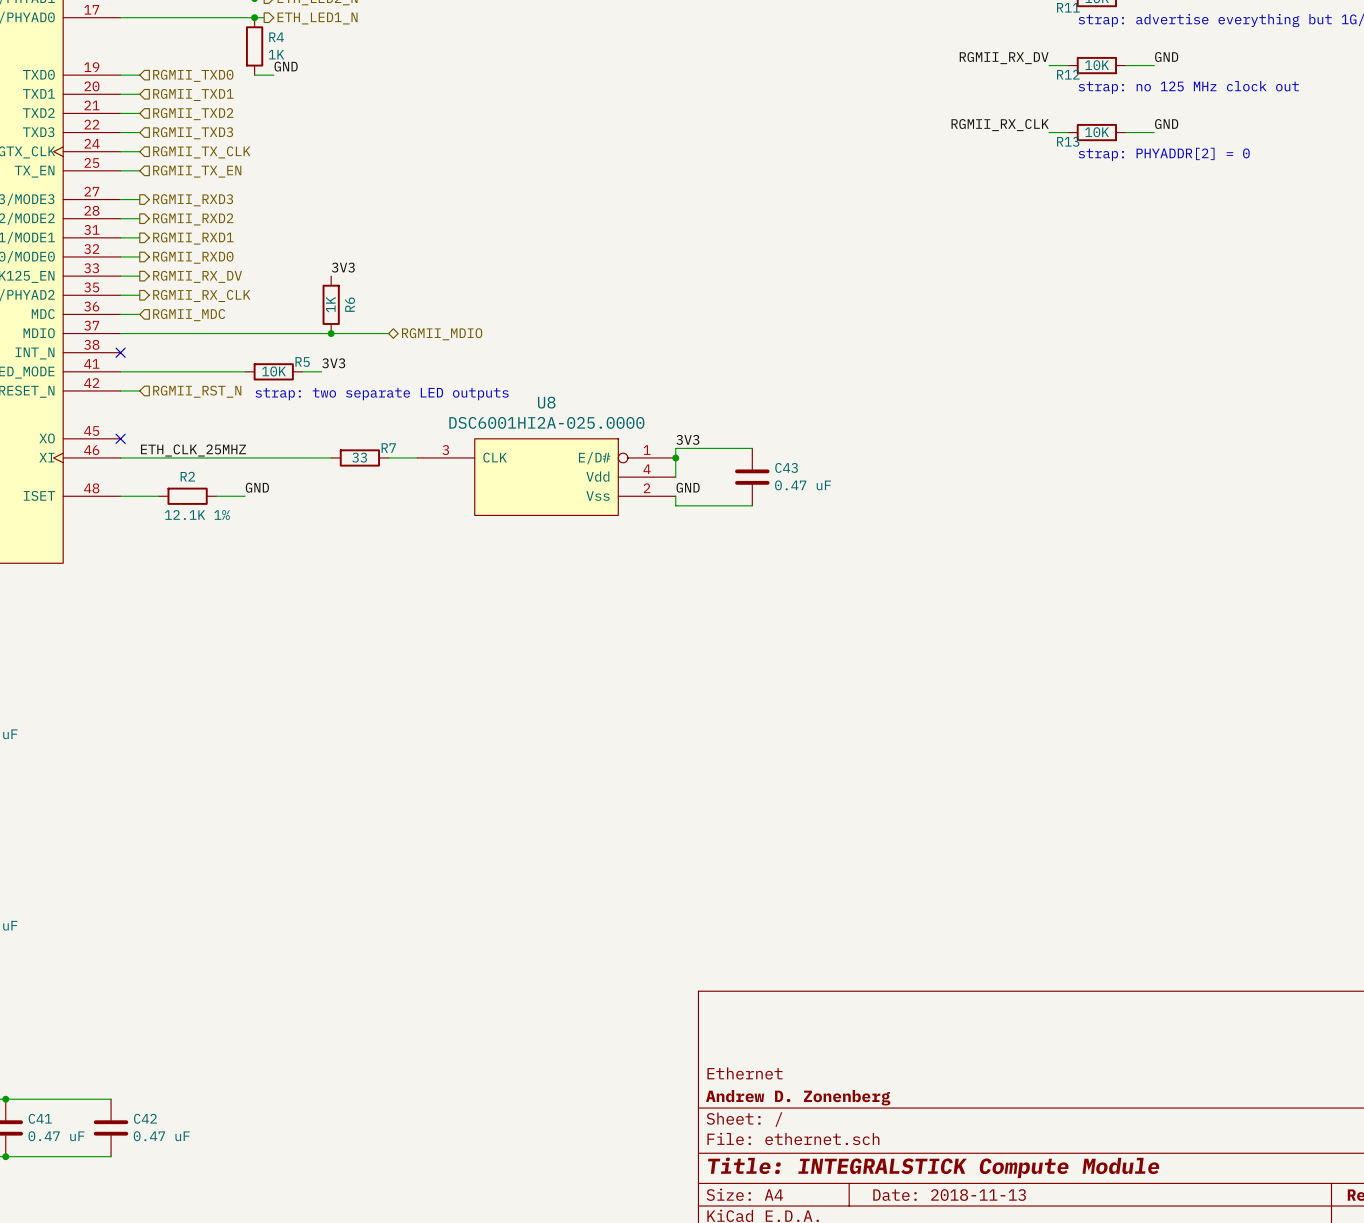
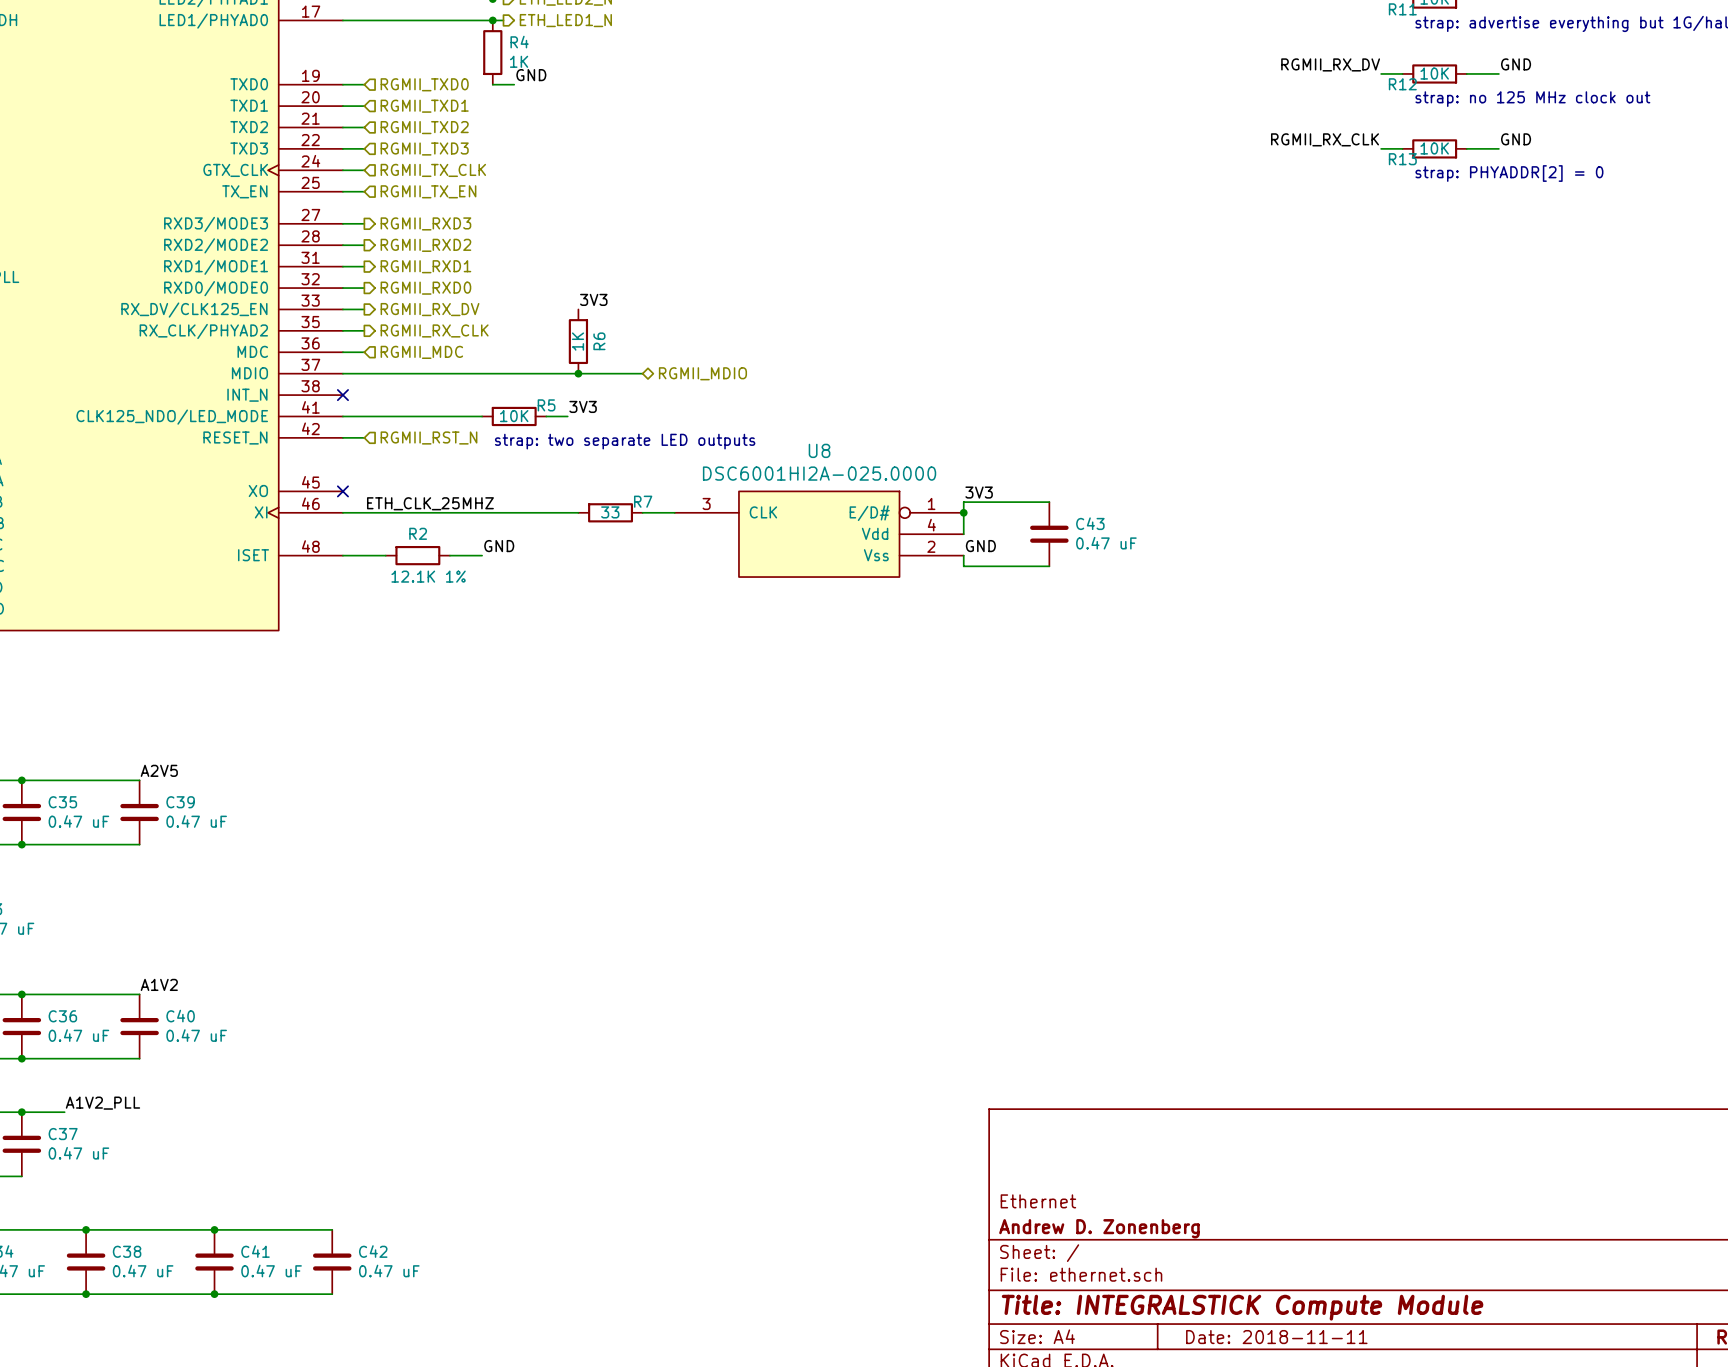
title block: Date: 2018-11-13 (949, 1195) -> Date: 2018-11-11 (1276, 1337)

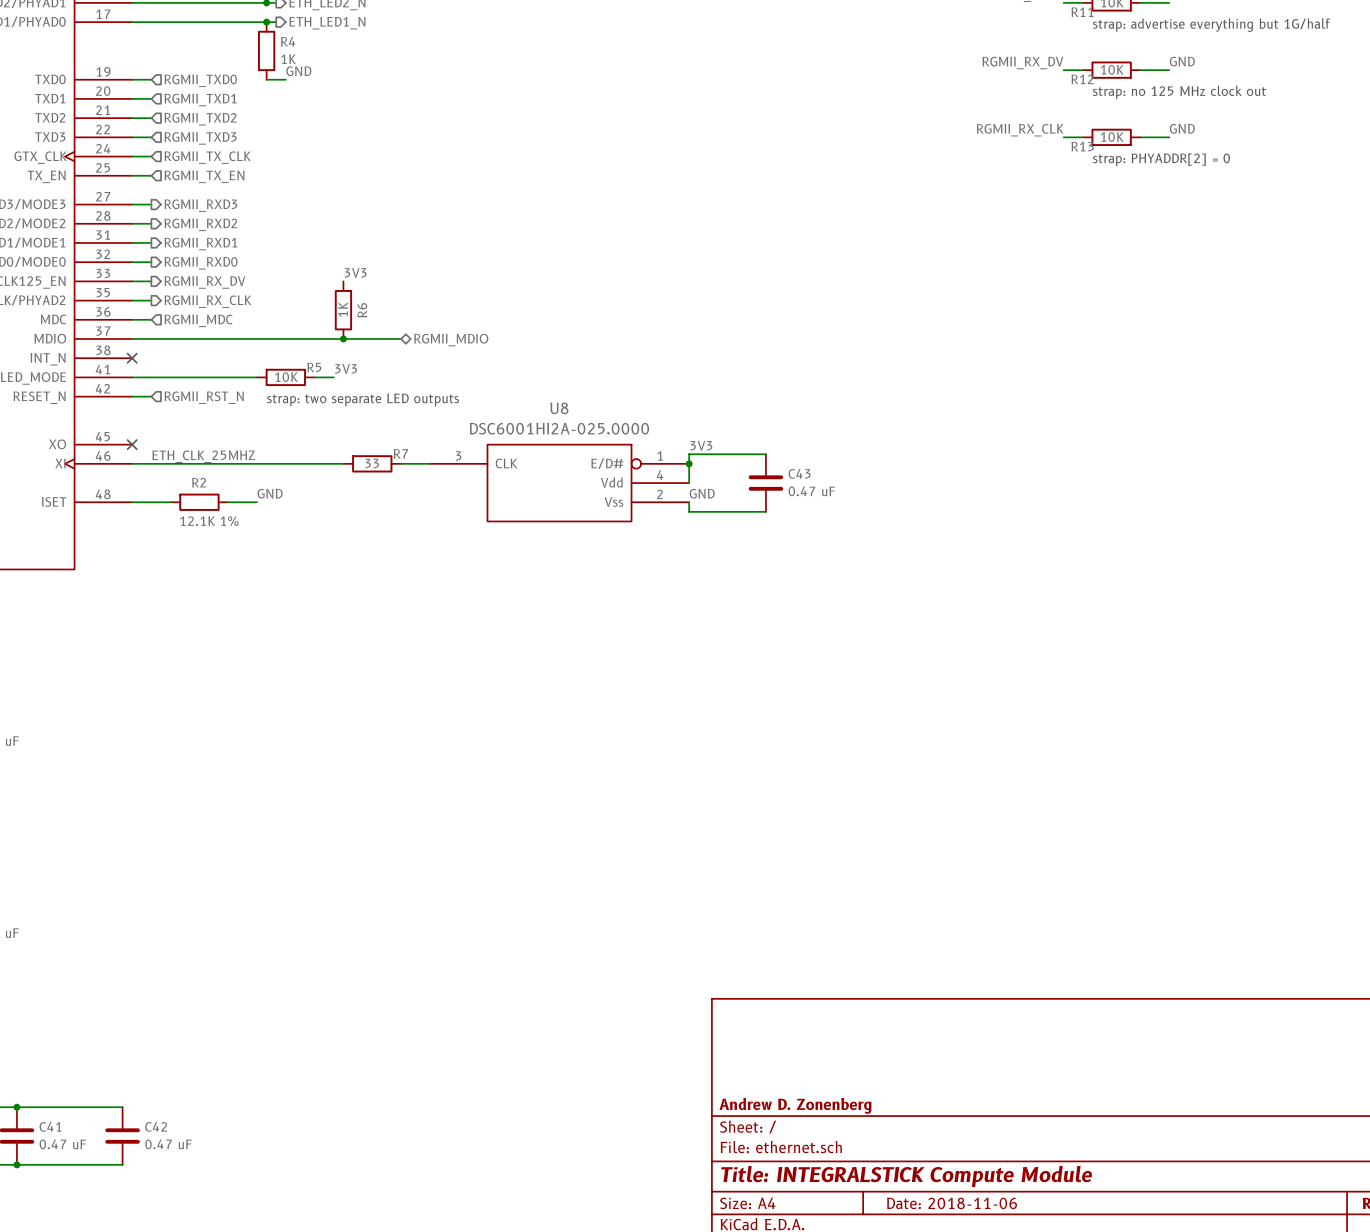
title block: Ethernet (1038, 1201) -> none
title block: Date: 2018-11-11 (1276, 1337) -> Date: 2018-11-06 (952, 1203)

